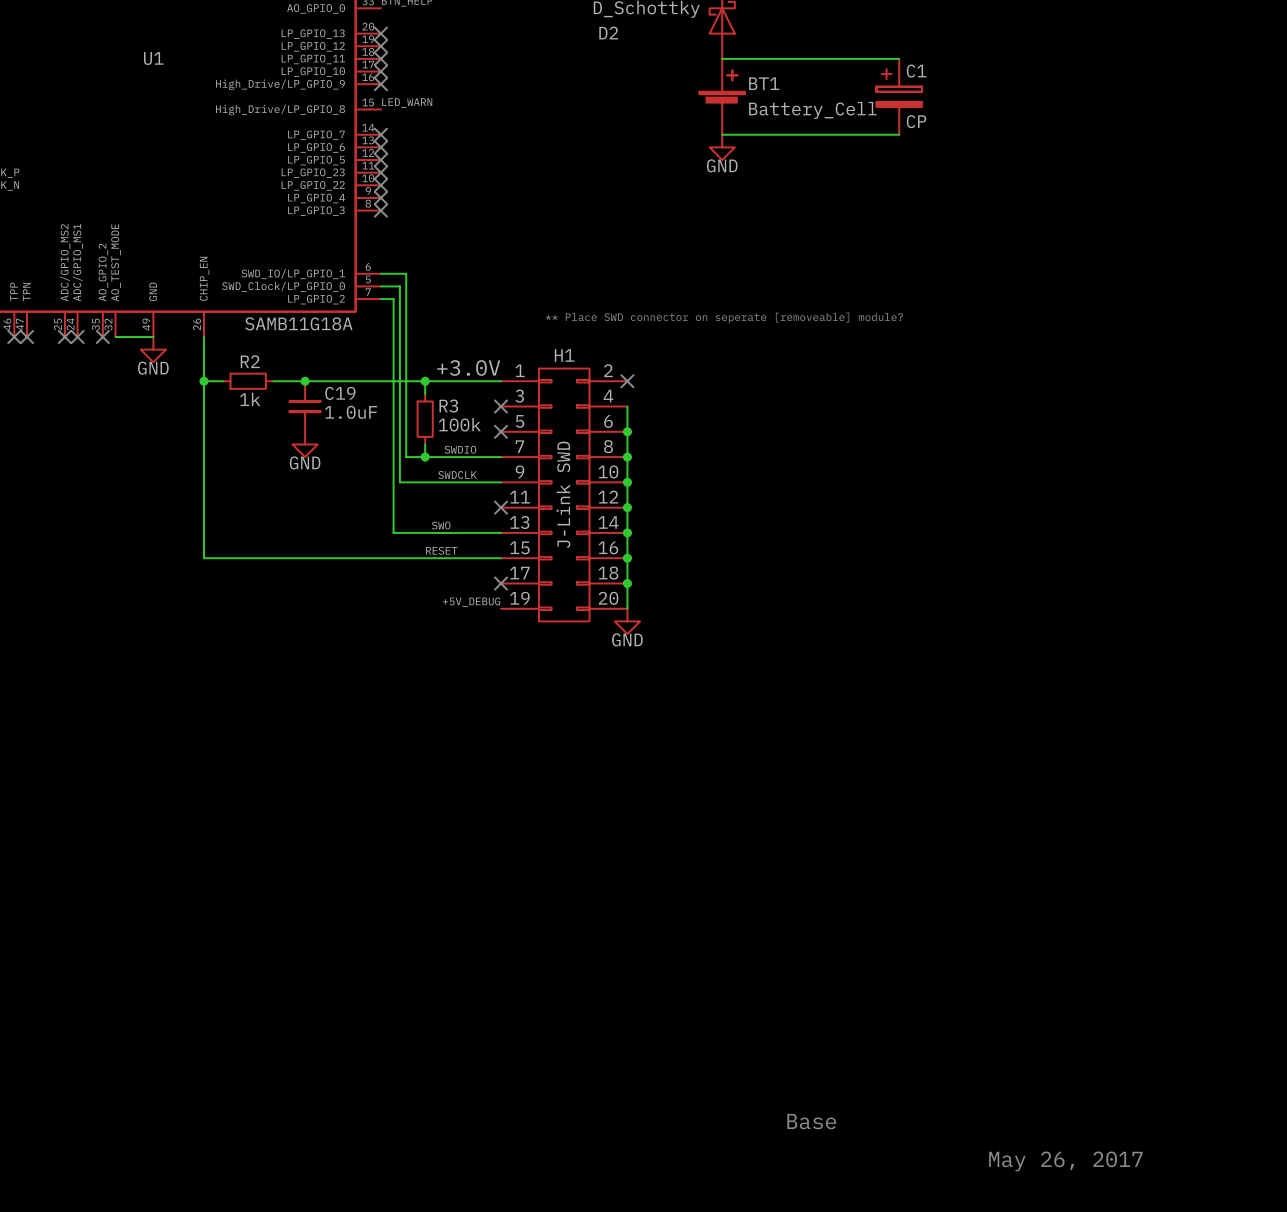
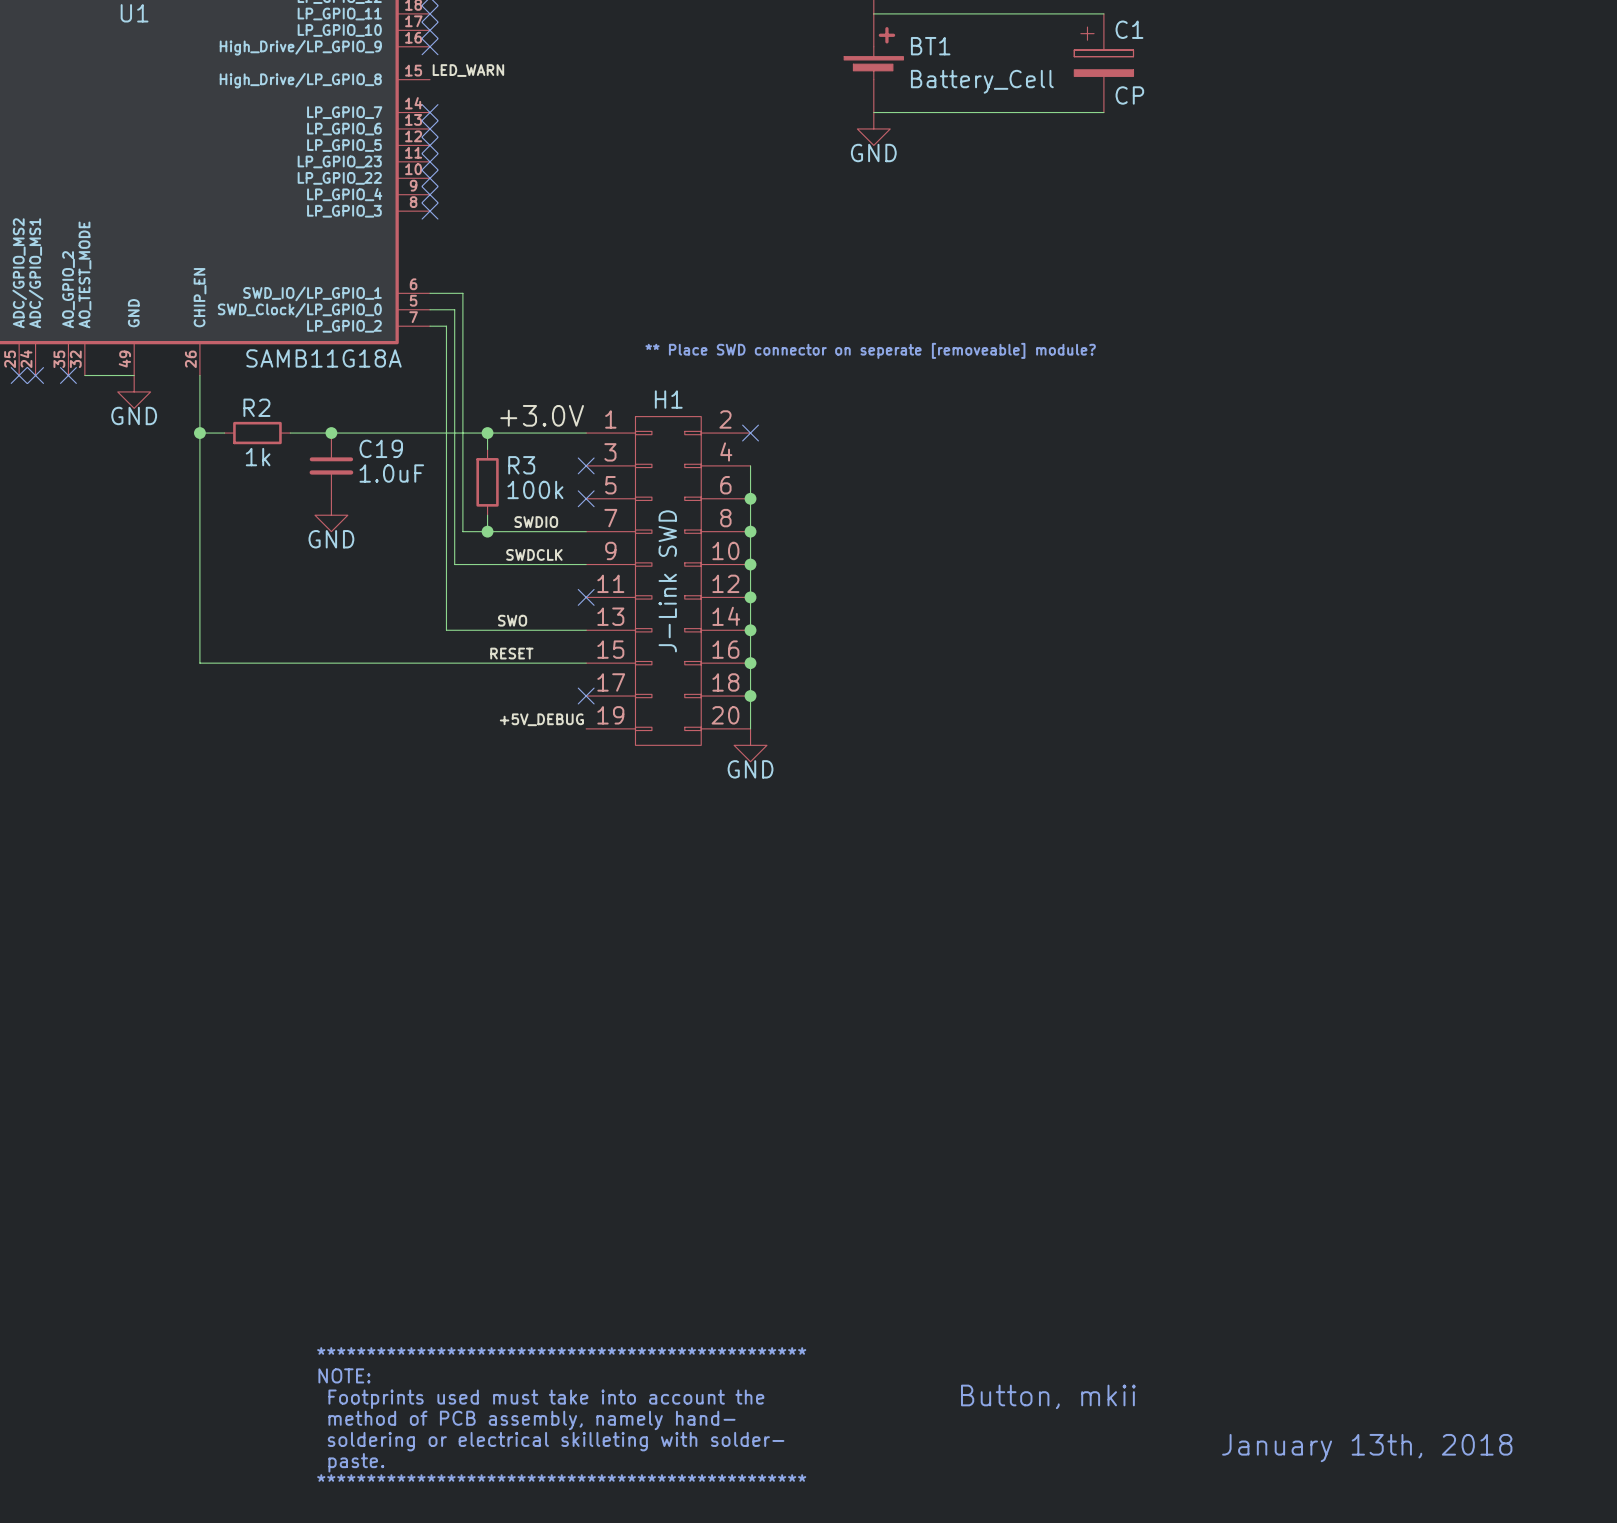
text: none -> ************************************************* (561, 1350)
text: none -> NOTE: (344, 1375)
text: Base (811, 1121) -> Button, mkii (1048, 1396)
text: none -> Footprints used must take into account the (546, 1399)
text: none -> method of PCB assembly, namely hand- (531, 1420)
text: none -> soldering or electrical skilleting with solder- (556, 1441)
text: May 26, 2017 (1065, 1161) -> January 13th, 2018 (1367, 1448)
text: none -> paste. (356, 1462)
text: none -> ************************************************* (561, 1477)

